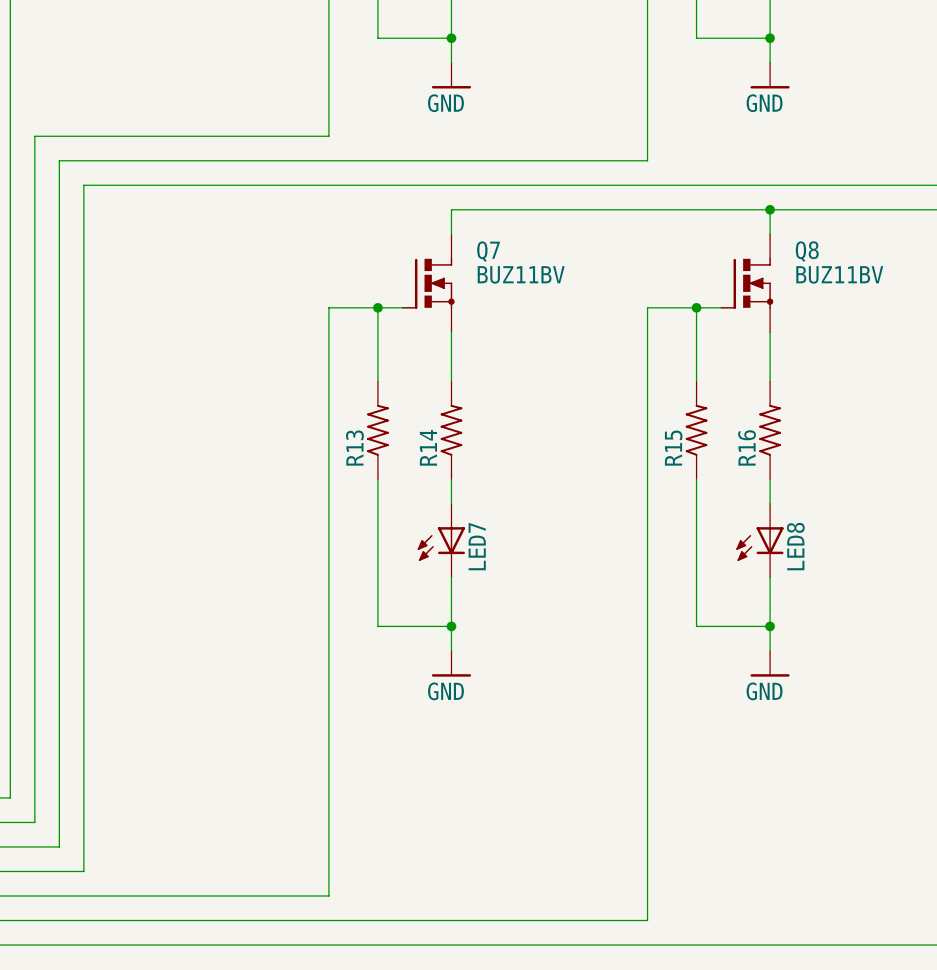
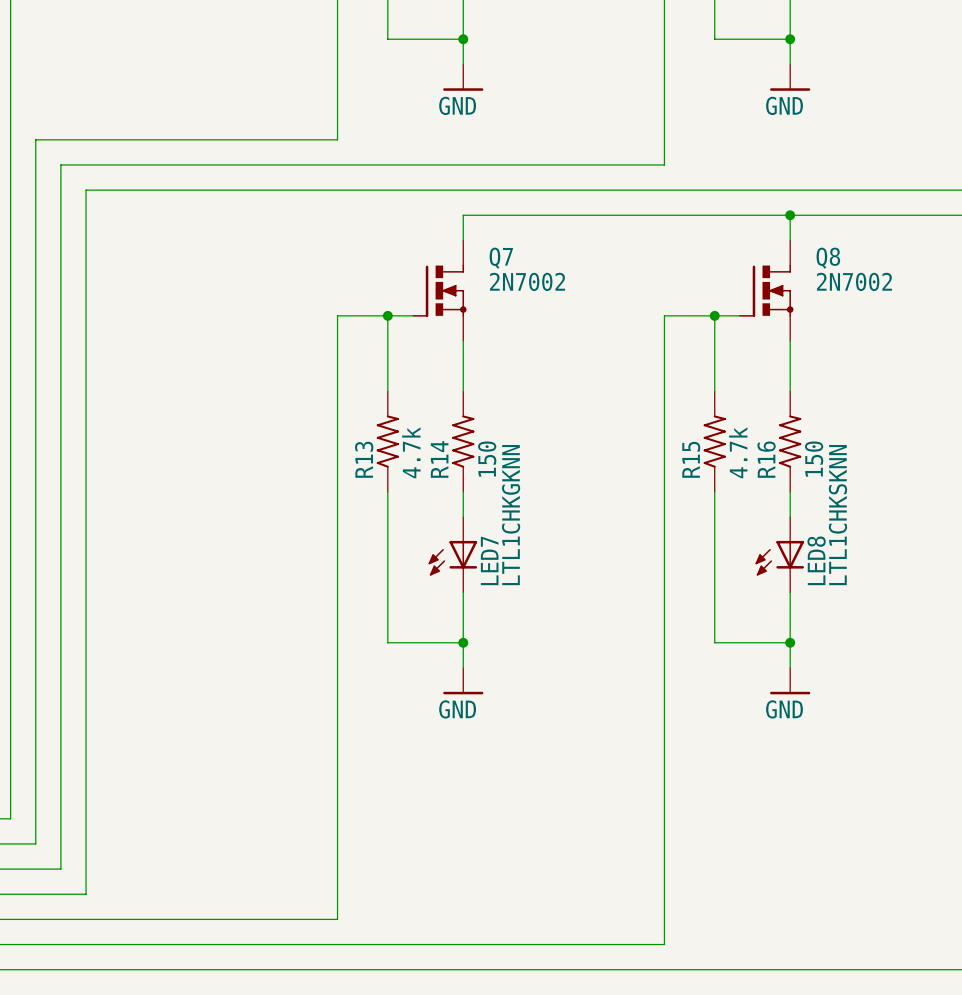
Q7 value: BUZ11BV (521, 274) -> 2N7002 (527, 281)
Q8 value: BUZ11BV (839, 274) -> 2N7002 (854, 281)
R13 value: none -> 4.7k (411, 452)
R15 value: none -> 4.7k (738, 452)
R14 value: none -> 150 (487, 459)
R16 value: none -> 150 (814, 459)
LED7 value: none -> LTL1CHKGKNN (511, 515)
LED8 value: none -> LTL1CHKSKNN (837, 515)

